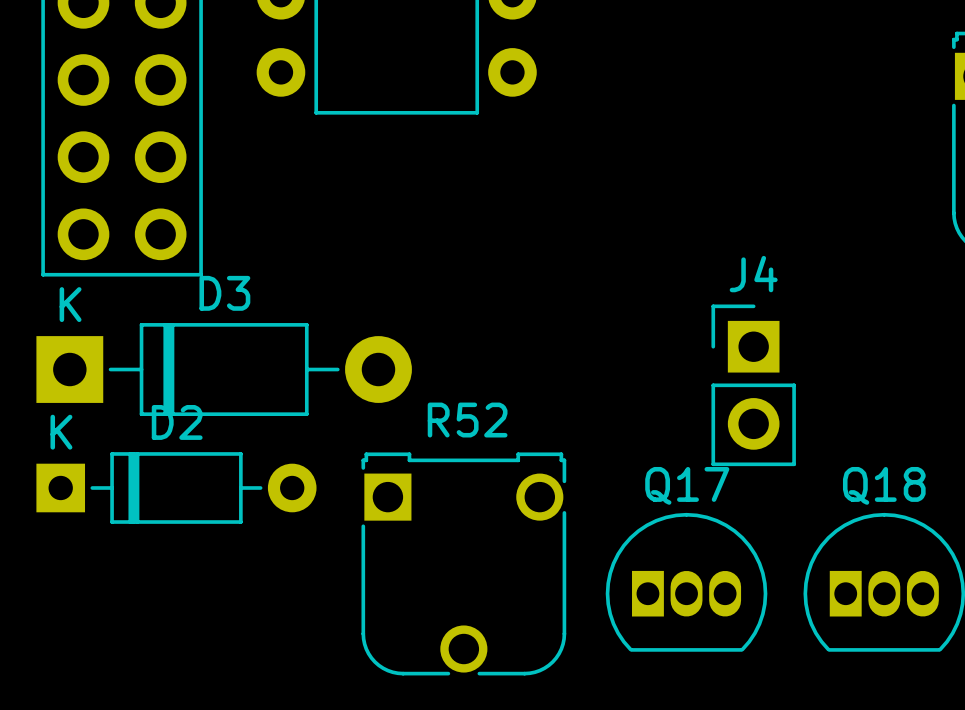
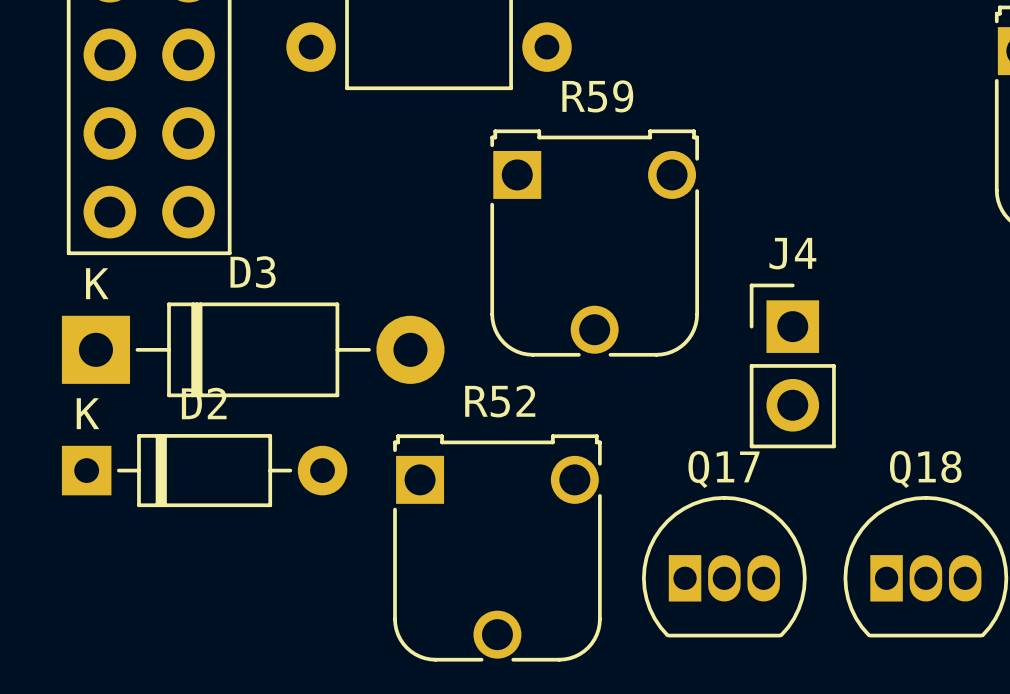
R59: none -> (594, 243)

